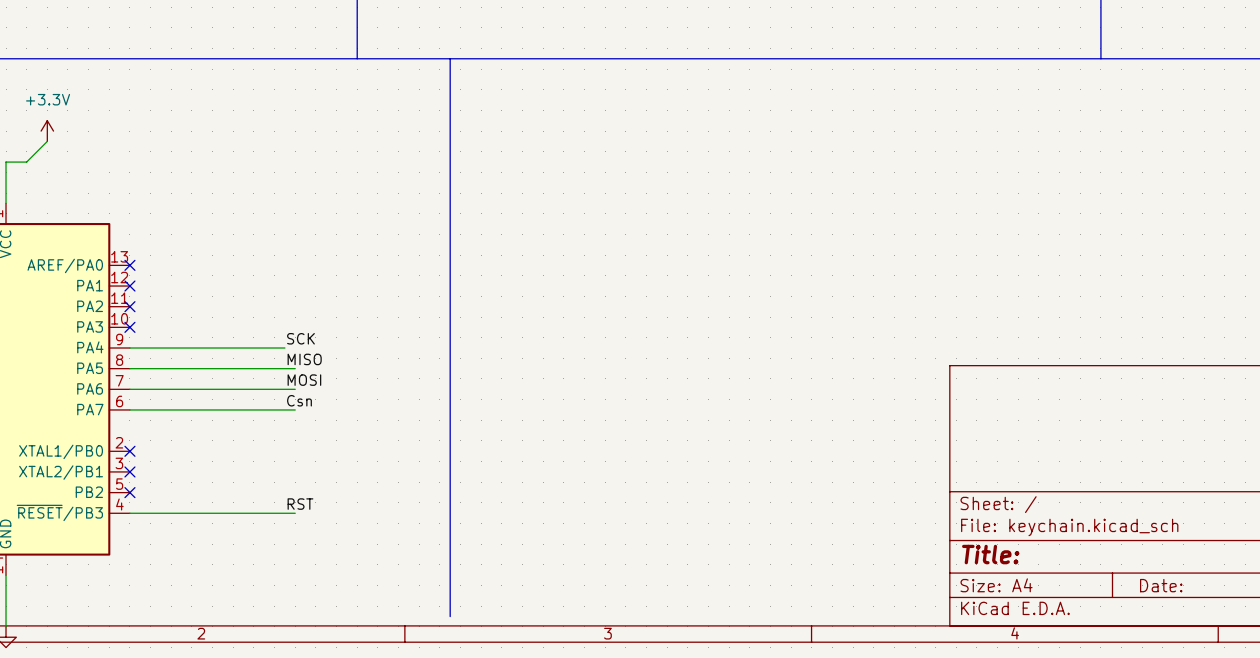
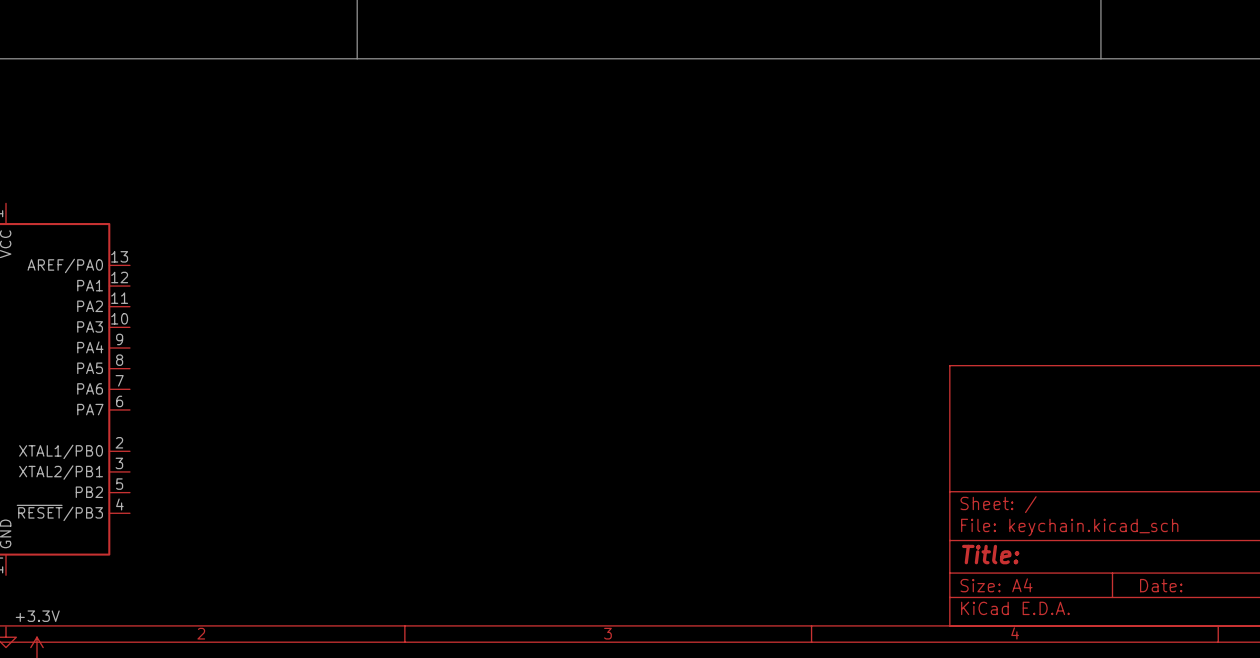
line: (450, 58) (450, 616) -> none
power symbol: +3.3V (47, 131) -> none
wire: (47, 141) (26, 162) (6, 162) (6, 203) -> none
no-connect mark: (129, 265) -> none
no-connect mark: (129, 286) -> none
no-connect mark: (129, 306) -> none
no-connect mark: (129, 327) -> none
label: SCK (300, 338) -> none
wire: (129, 348) (284, 348) -> none
label: MISO (304, 359) -> none
wire: (129, 368) (295, 368) -> none
label: MOSI (304, 380) -> none
wire: (129, 389) (295, 389) -> none
label: Csn (299, 400) -> none
wire: (129, 409) (295, 409) -> none
no-connect mark: (129, 451) -> none
no-connect mark: (129, 471) -> none
no-connect mark: (129, 492) -> none
label: RST (300, 504) -> none
wire: (129, 513) (295, 513) -> none
wire: (6, 575) (6, 626) -> none
power symbol: none -> +3.3V (36, 647)

